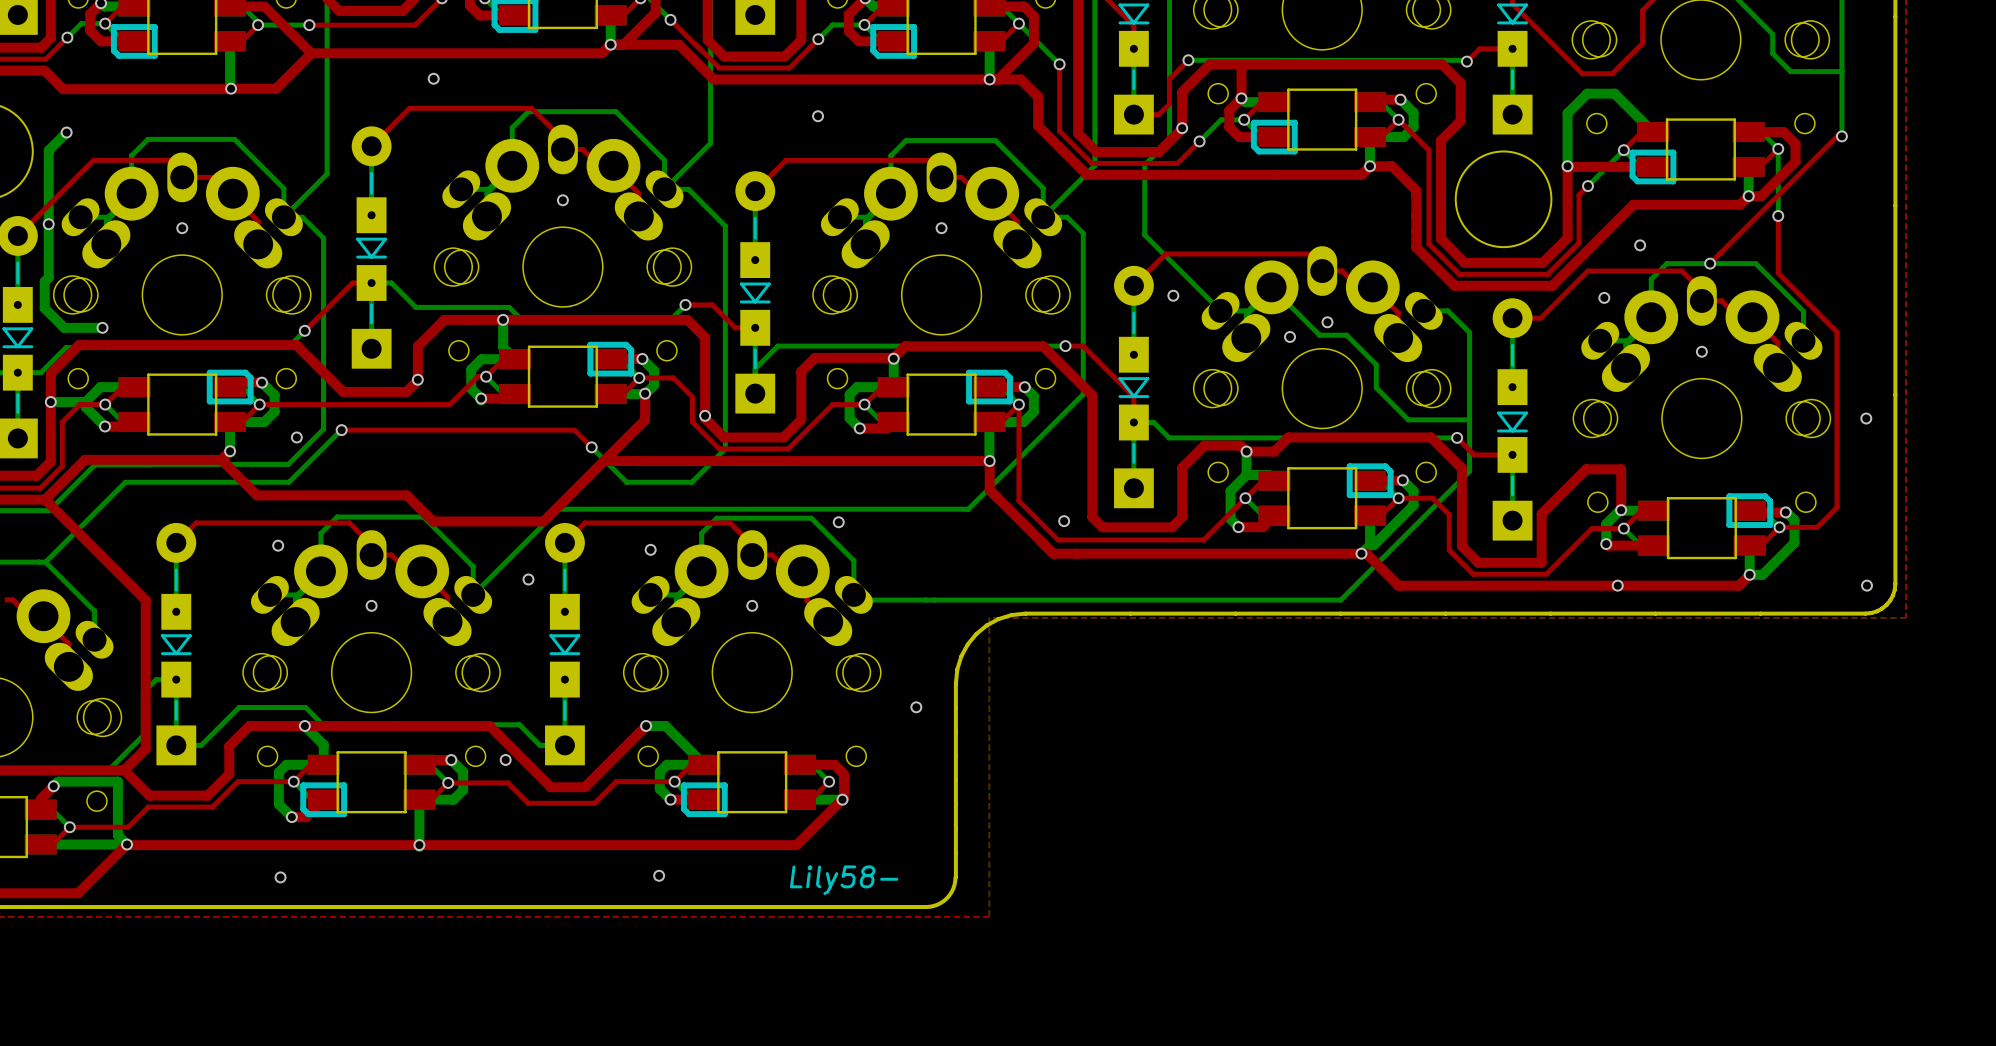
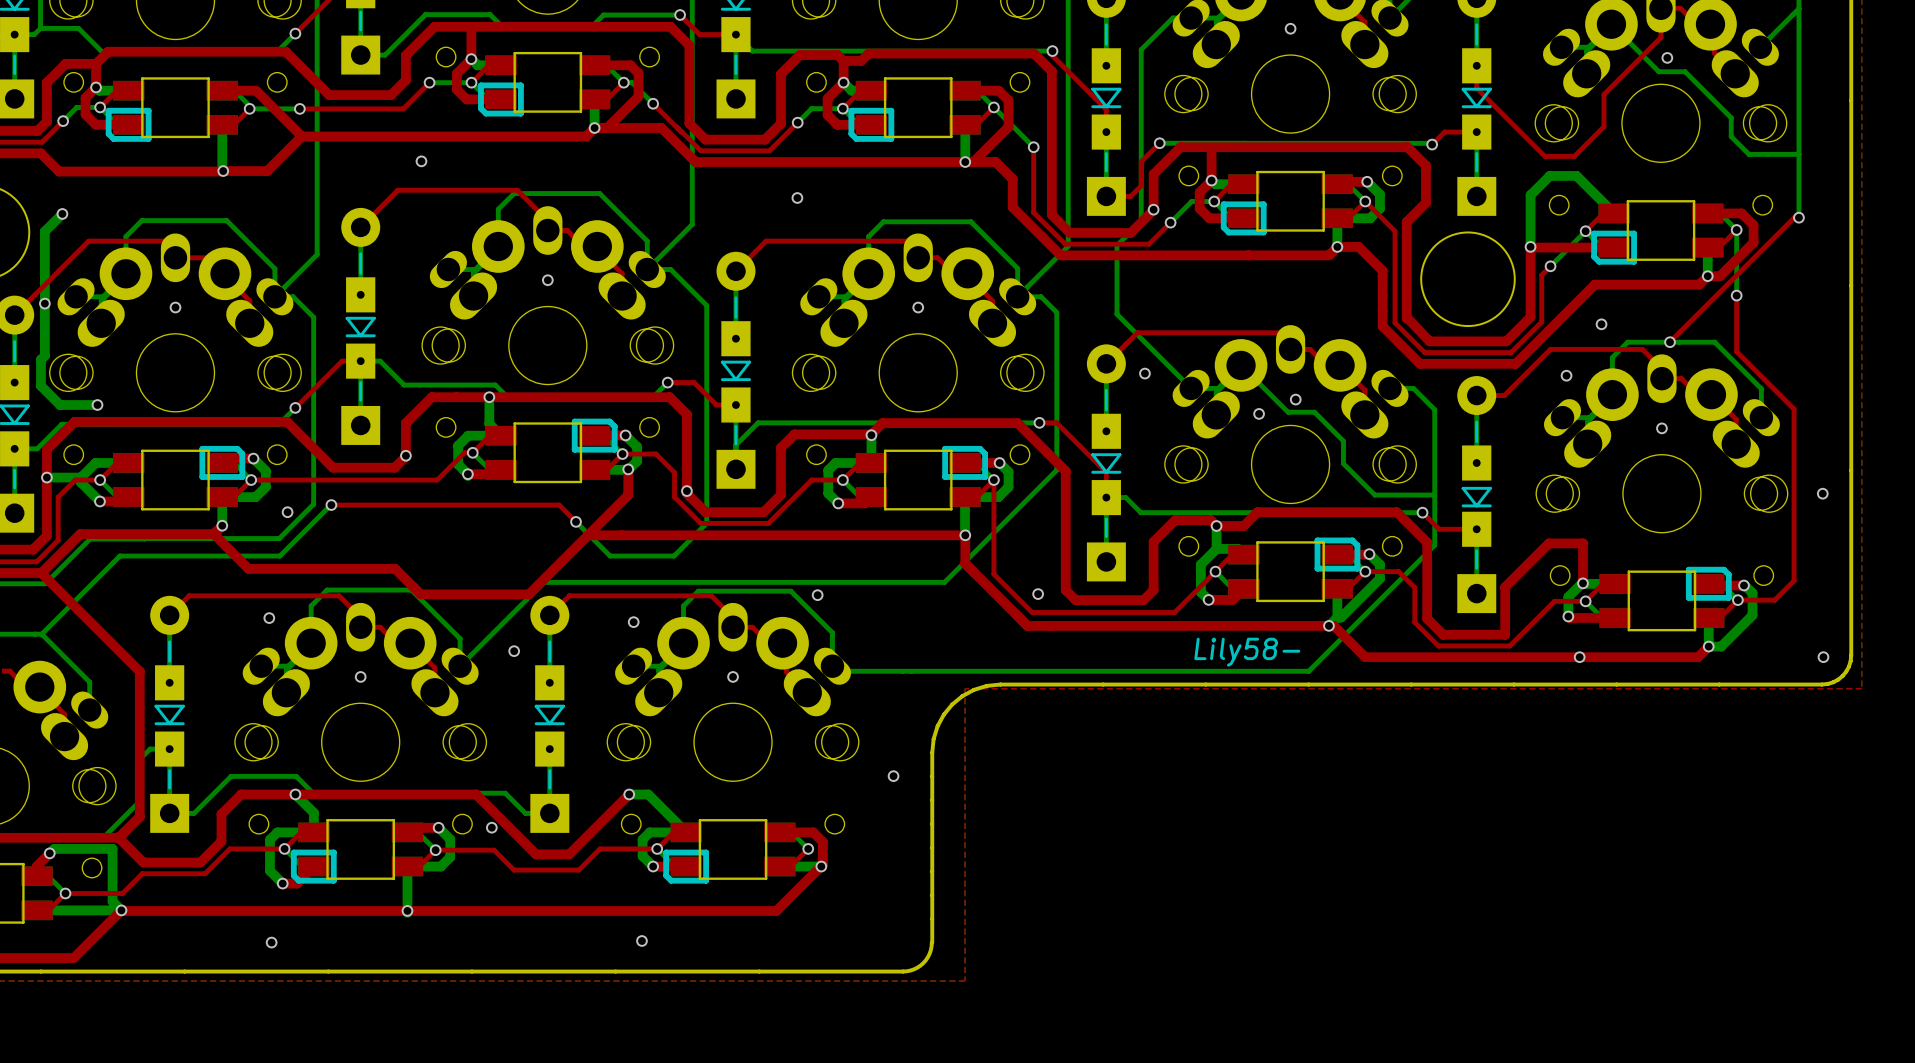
text: none -> Lily58- (1247, 652)
text: Lily58- (844, 880) -> none

